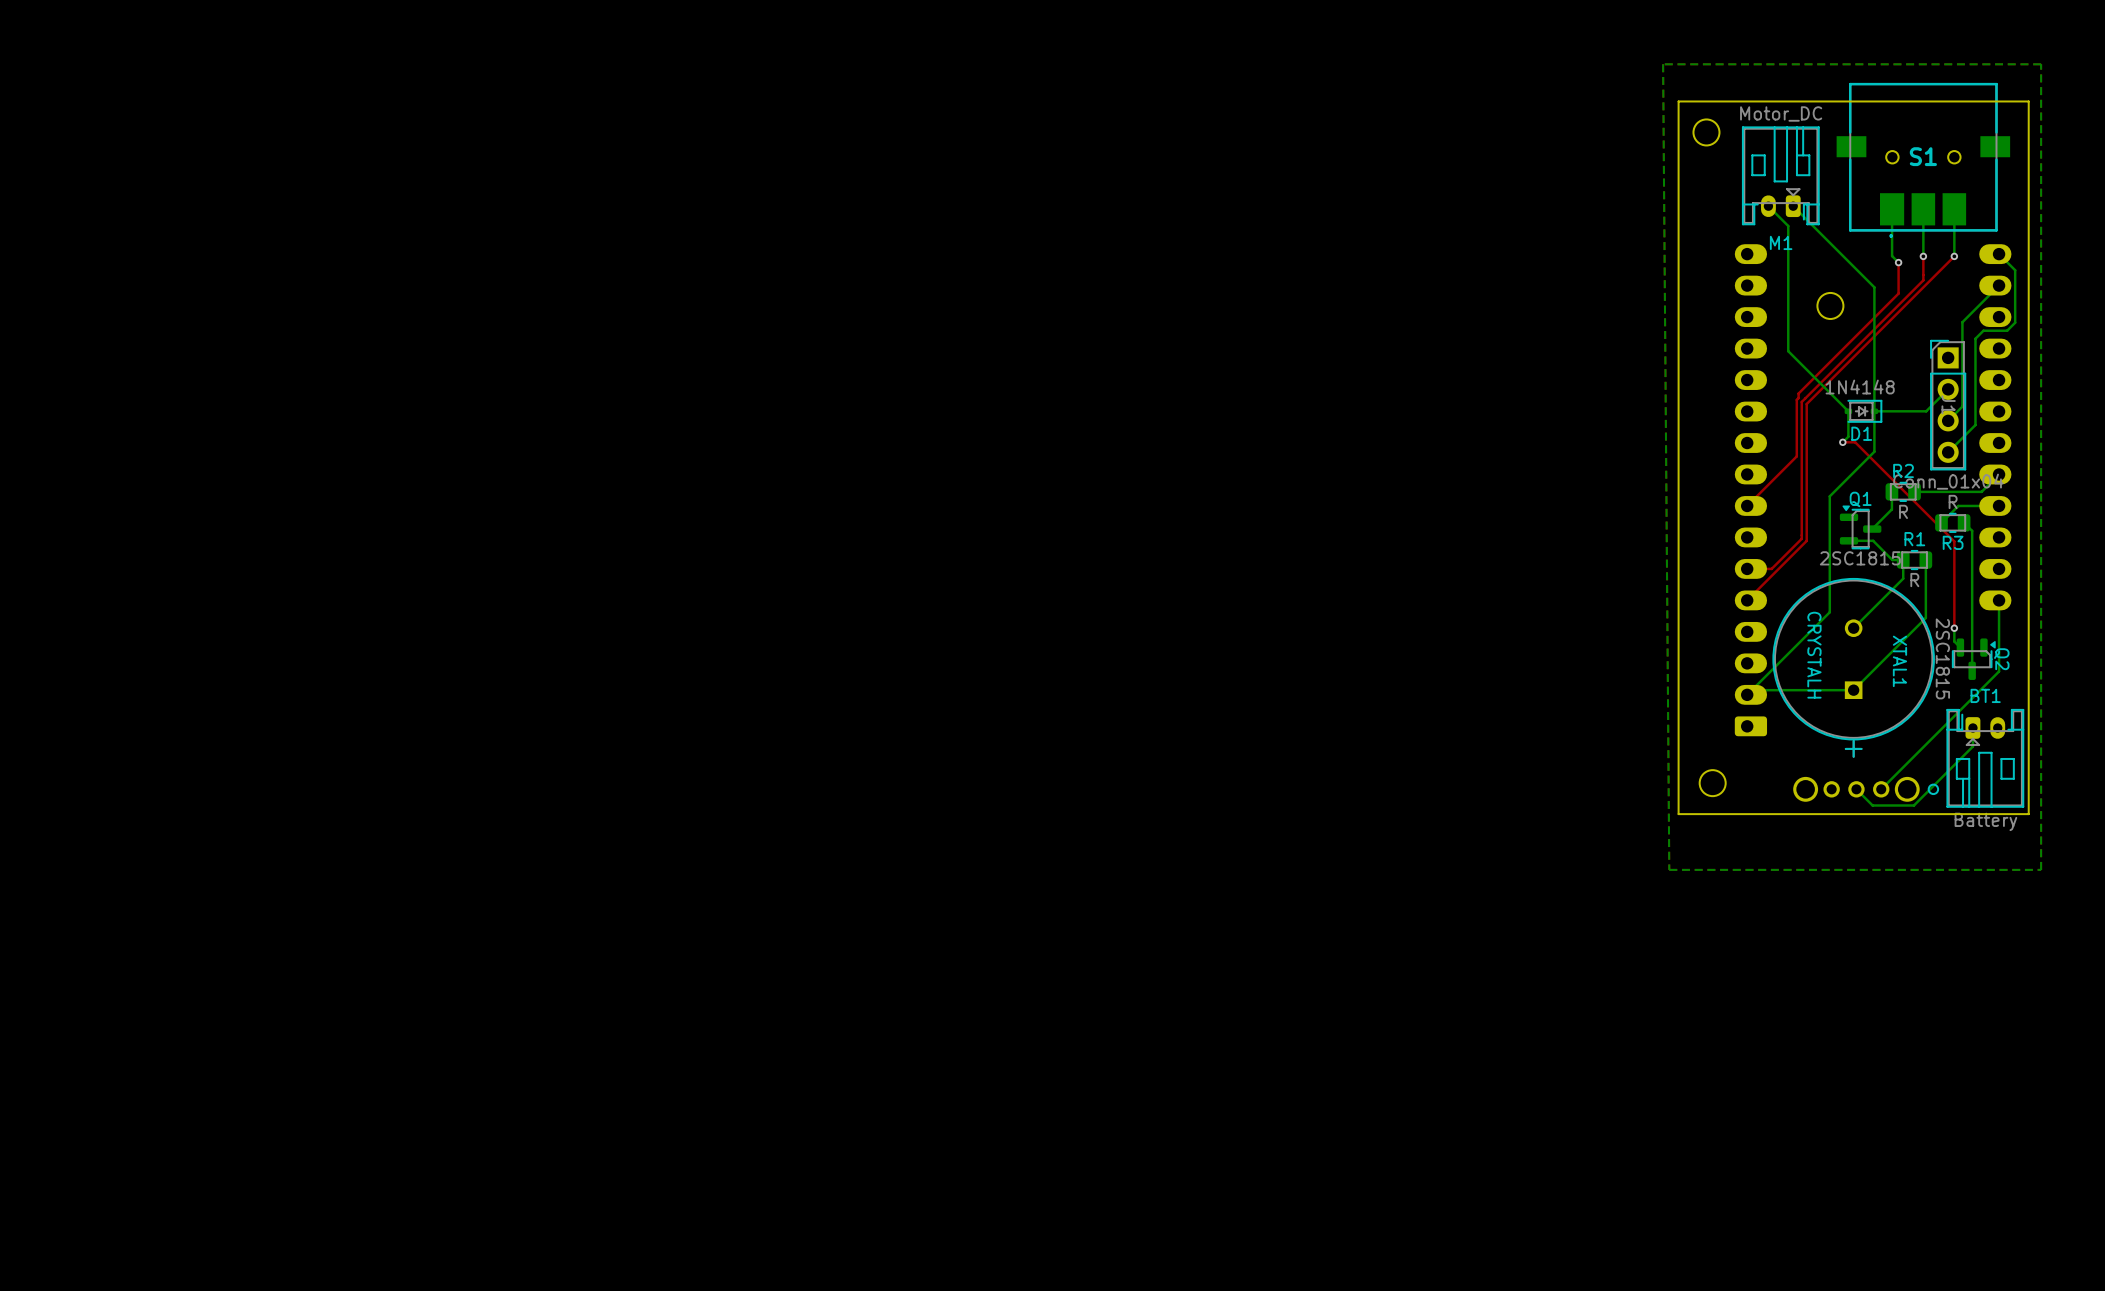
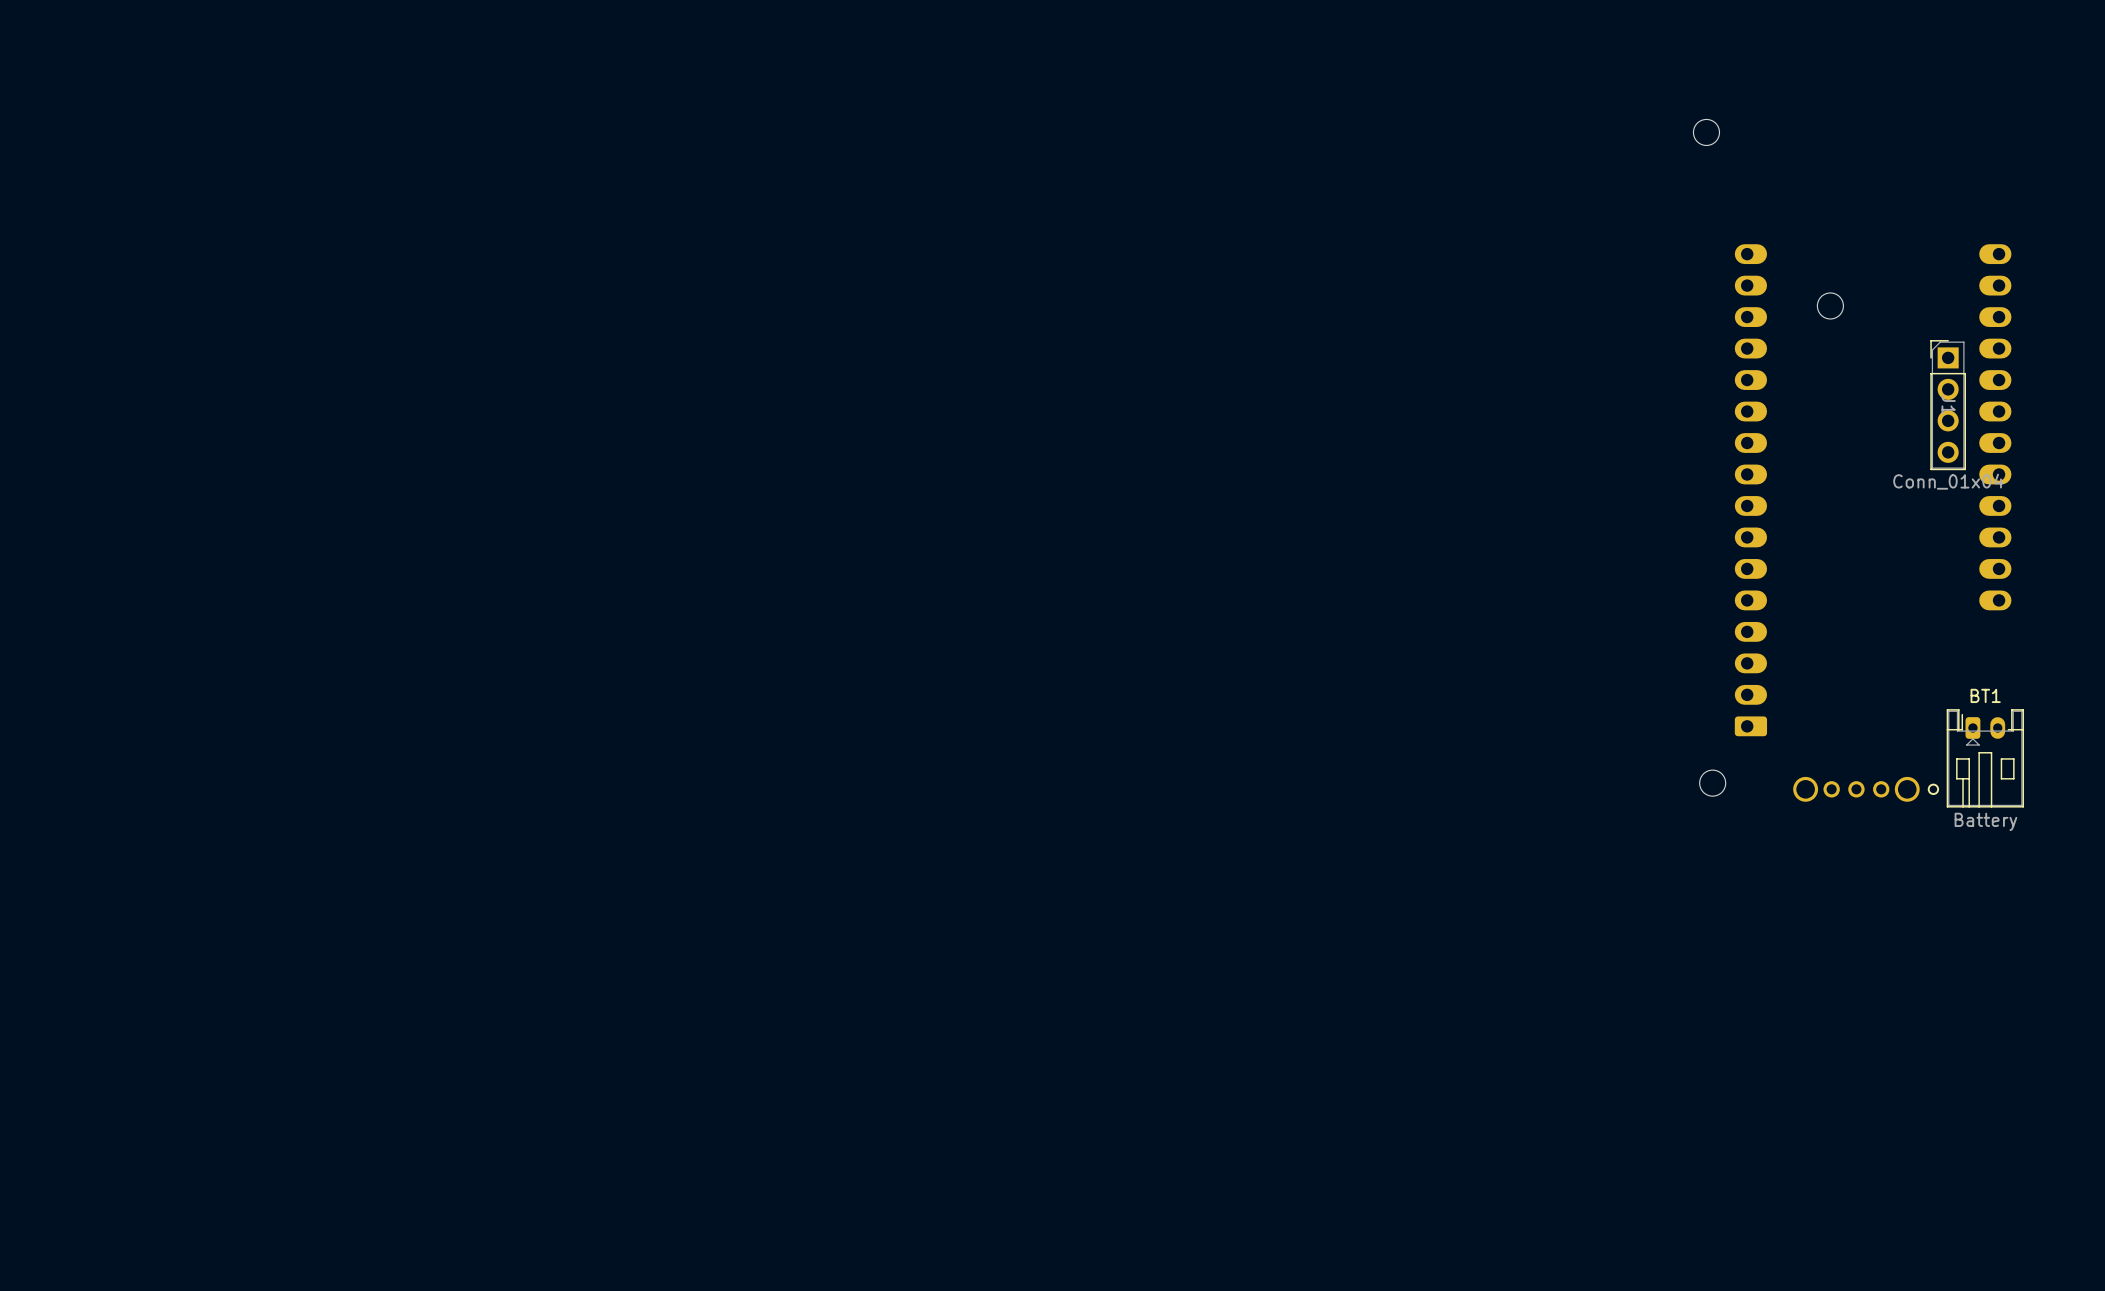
bottom zone outline: (2041, 64) (1663, 64) (1669, 869) (2041, 869) (2041, 64) -> none
board edge: (2028, 101) (1678, 101) (1678, 814) (2028, 814) (2028, 101) -> none
S1: (1923, 160) -> none
M1: Motor_DC (1780, 175) -> none
bottom track: (1768, 206) (1788, 226) (1788, 351) (1848, 411) (1848, 436) (1842, 442) -> none
bottom track: (1793, 206) (1874, 287) (1874, 451) (1829, 496) (1829, 612) (1747, 694) -> none
bottom track: (1892, 209) (1892, 256) (1898, 262) -> none
bottom track: (1923, 209) (1923, 256) -> none
bottom track: (1954, 209) (1954, 256) -> none
bottom track: (1999, 254) (2015, 270) (2015, 322) (2007, 330) (1983, 330) (1975, 338) (1975, 425) (1948, 452) -> none
top track: (1923, 256) (1923, 280) (1801, 401) (1801, 538) (1771, 568) (1747, 568) -> none
via: (1923, 256) -> none
top track: (1954, 256) (1806, 404) (1806, 540) (1747, 600) -> none
via: (1954, 256) -> none
top track: (1898, 262) (1898, 293) (1798, 393) (1796, 399) (1796, 456) (1747, 505) -> none
via: (1898, 262) -> none
bottom track: (1999, 285) (1962, 322) (1962, 406) (1948, 420) -> none
bottom track: (1948, 389) (1926, 411) (1874, 411) -> none
D1: 1N4148 (1863, 411) -> none
top track: (1842, 442) (1855, 442) (1954, 541) (1954, 628) -> none
via: (1842, 442) -> none
bottom track: (1999, 474) (1981, 491) (1914, 491) -> none
bottom track: (1891, 491) (1891, 509) (1872, 529) -> none
R2: R (1903, 491) -> none
bottom track: (1999, 505) (1958, 505) (1941, 522) -> none
R3: R (1952, 522) -> none
bottom track: (1964, 522) (1972, 530) (1972, 670) -> none
Q1: 2SC1815 (1860, 527) -> none
bottom track: (1849, 540) (1873, 540) (1892, 560) (1903, 560) (1903, 578) (1853, 628) -> none
R1: R (1914, 560) -> none
bottom track: (1925, 560) (1925, 617) (1853, 690) (1751, 690) -> none
bottom track: (1999, 600) (1999, 671) (1881, 789) -> none
bottom track: (1954, 628) (1954, 641) (1960, 647) -> none
via: (1954, 628) -> none
Q2: 2SC1815 (1973, 659) -> none
XTAL1: CRYSTALH (1853, 667) -> none
bottom track: (1972, 727) (1972, 746) (1913, 805) (1872, 805) (1856, 789) -> none

